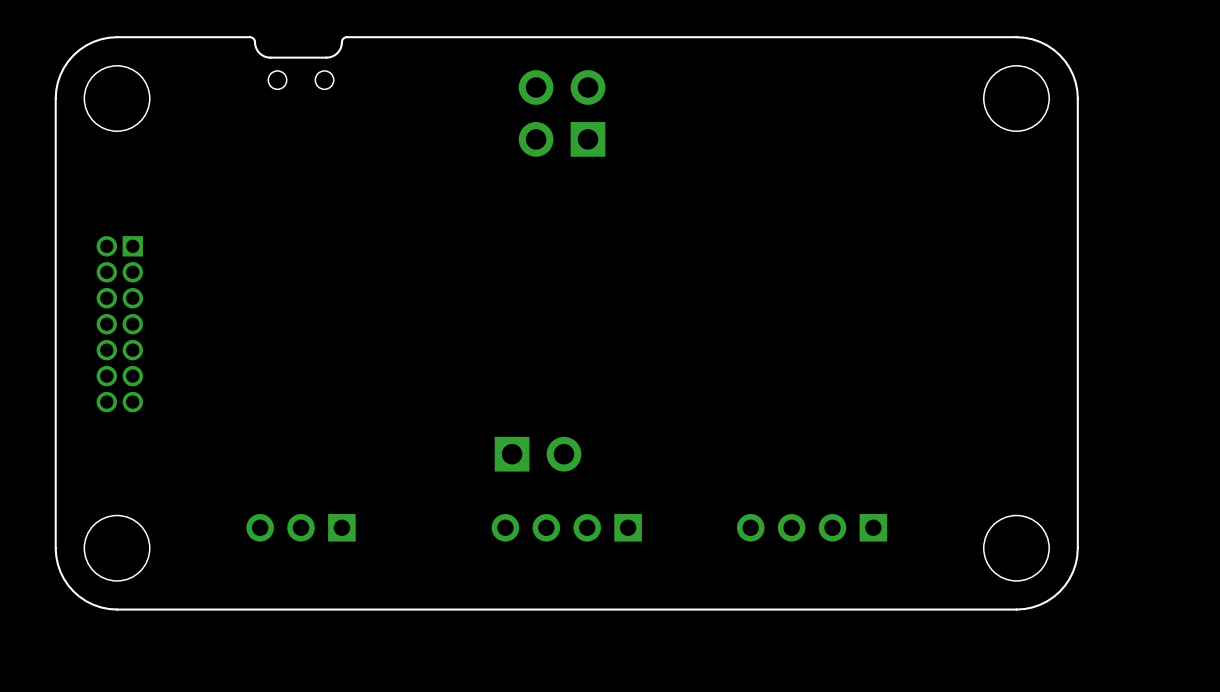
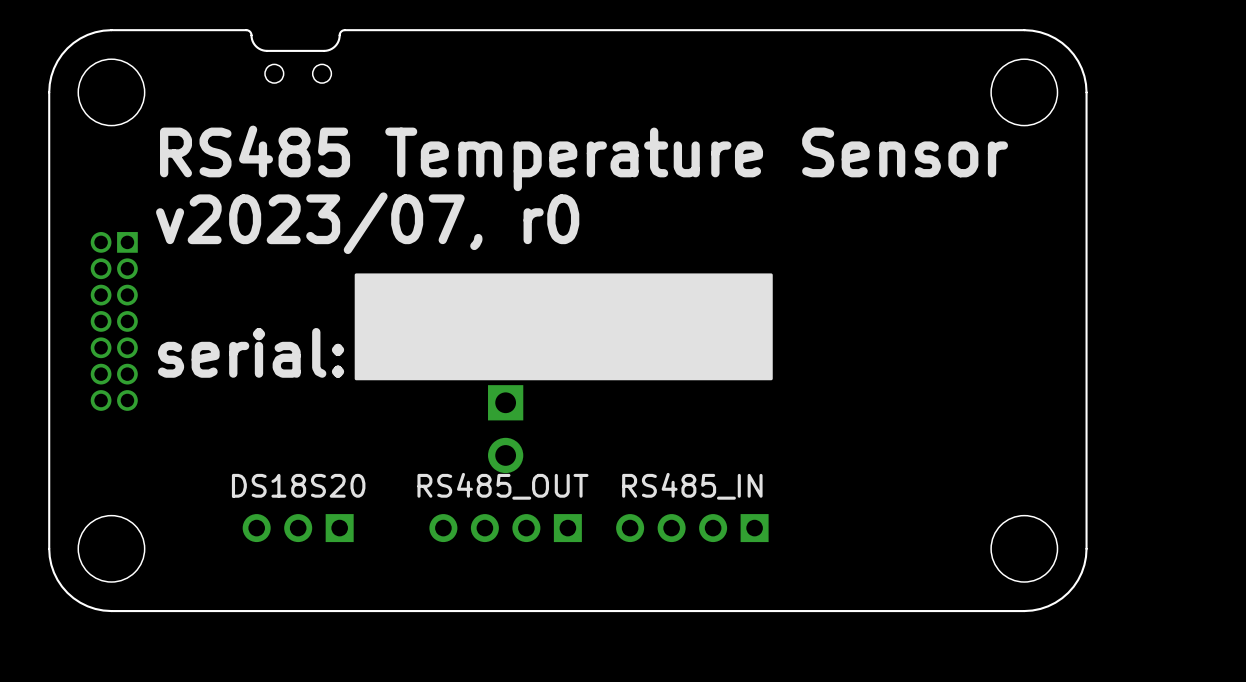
part: (562, 113) -> none
text: none -> RS485 Temperature Sensor (584, 158)
text: none -> v2023/07, r0 (367, 223)
drawing: none -> [354, 273, 773, 381]
text: none -> serial: (251, 352)
part rotation: 0° (538, 454) -> 90° clockwise (505, 429)
part text: none -> DS18S20 (298, 485)
part: none -> RS485_OUT (505, 528)
part: (566, 527) -> none
part: none -> RS485_IN (692, 528)
part: (812, 527) -> none

